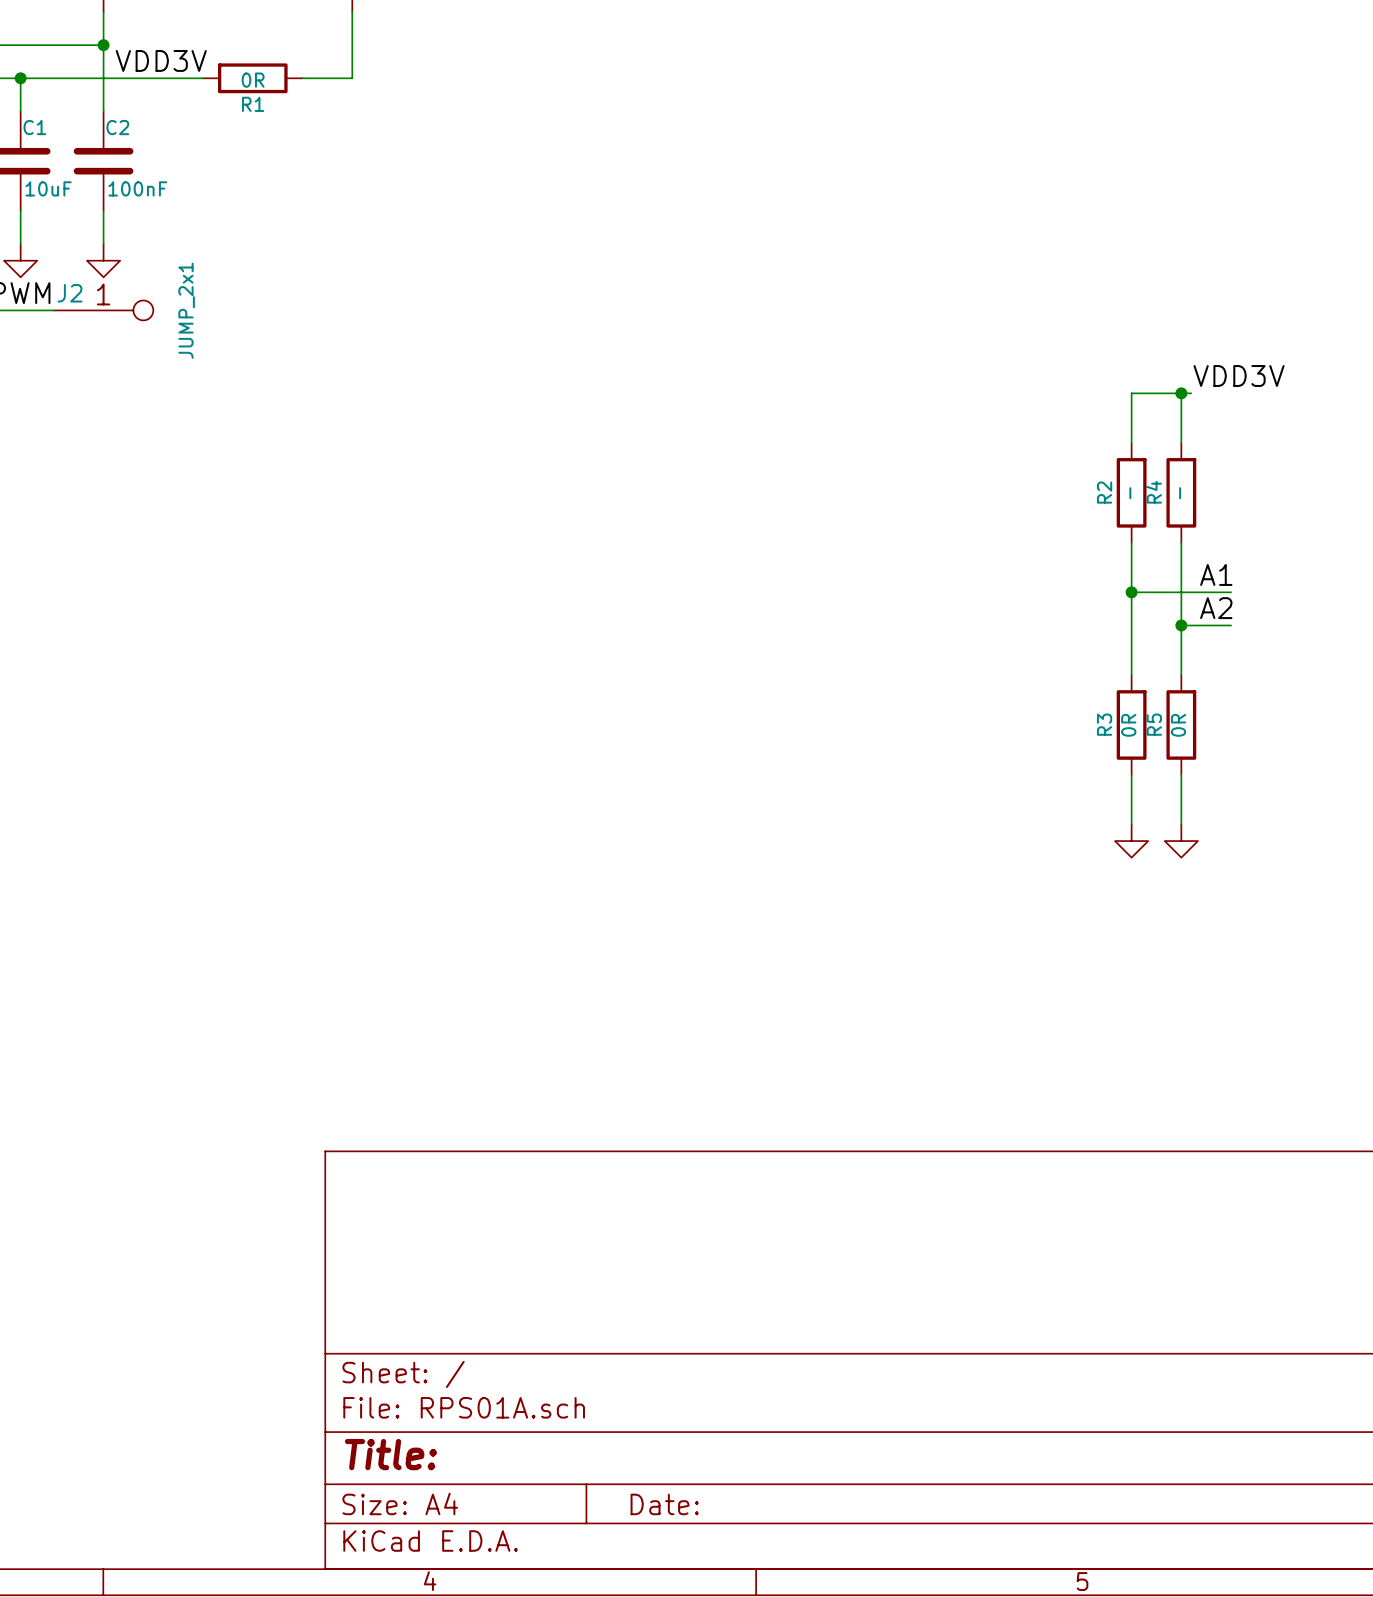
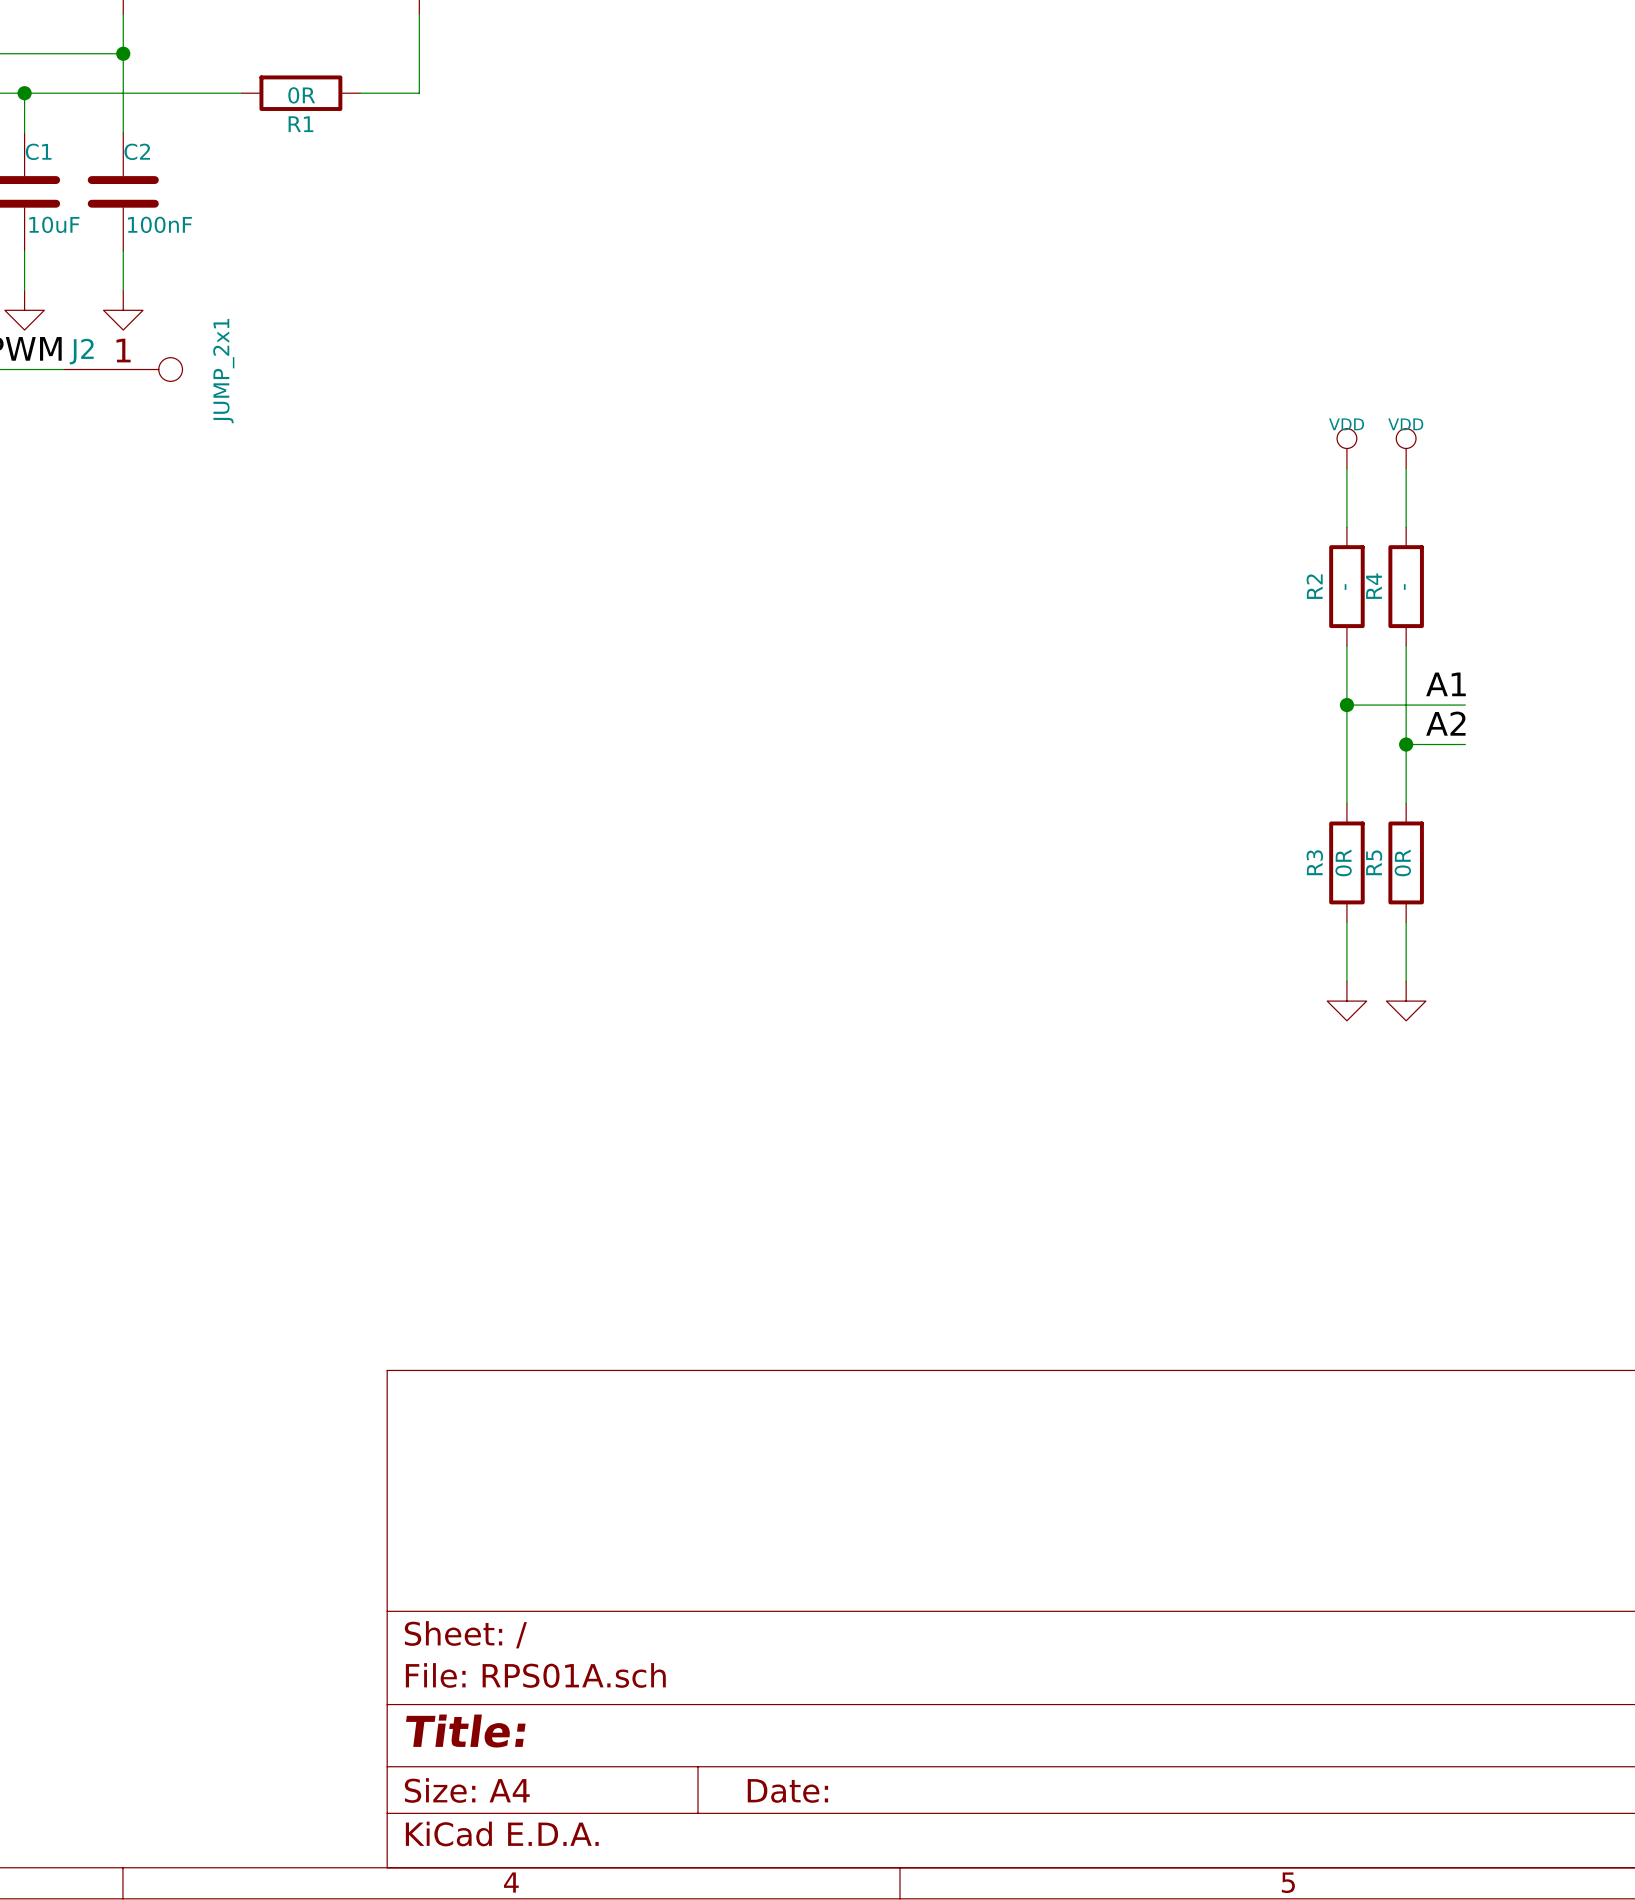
label: VDD3V (161, 60) -> none
label: VDD3V (1239, 375) -> none
power symbol: none -> VDD (1346, 448)
power symbol: none -> VDD (1406, 448)
wire: (1131, 393) (1191, 393) -> none
junction: (1181, 393) -> none

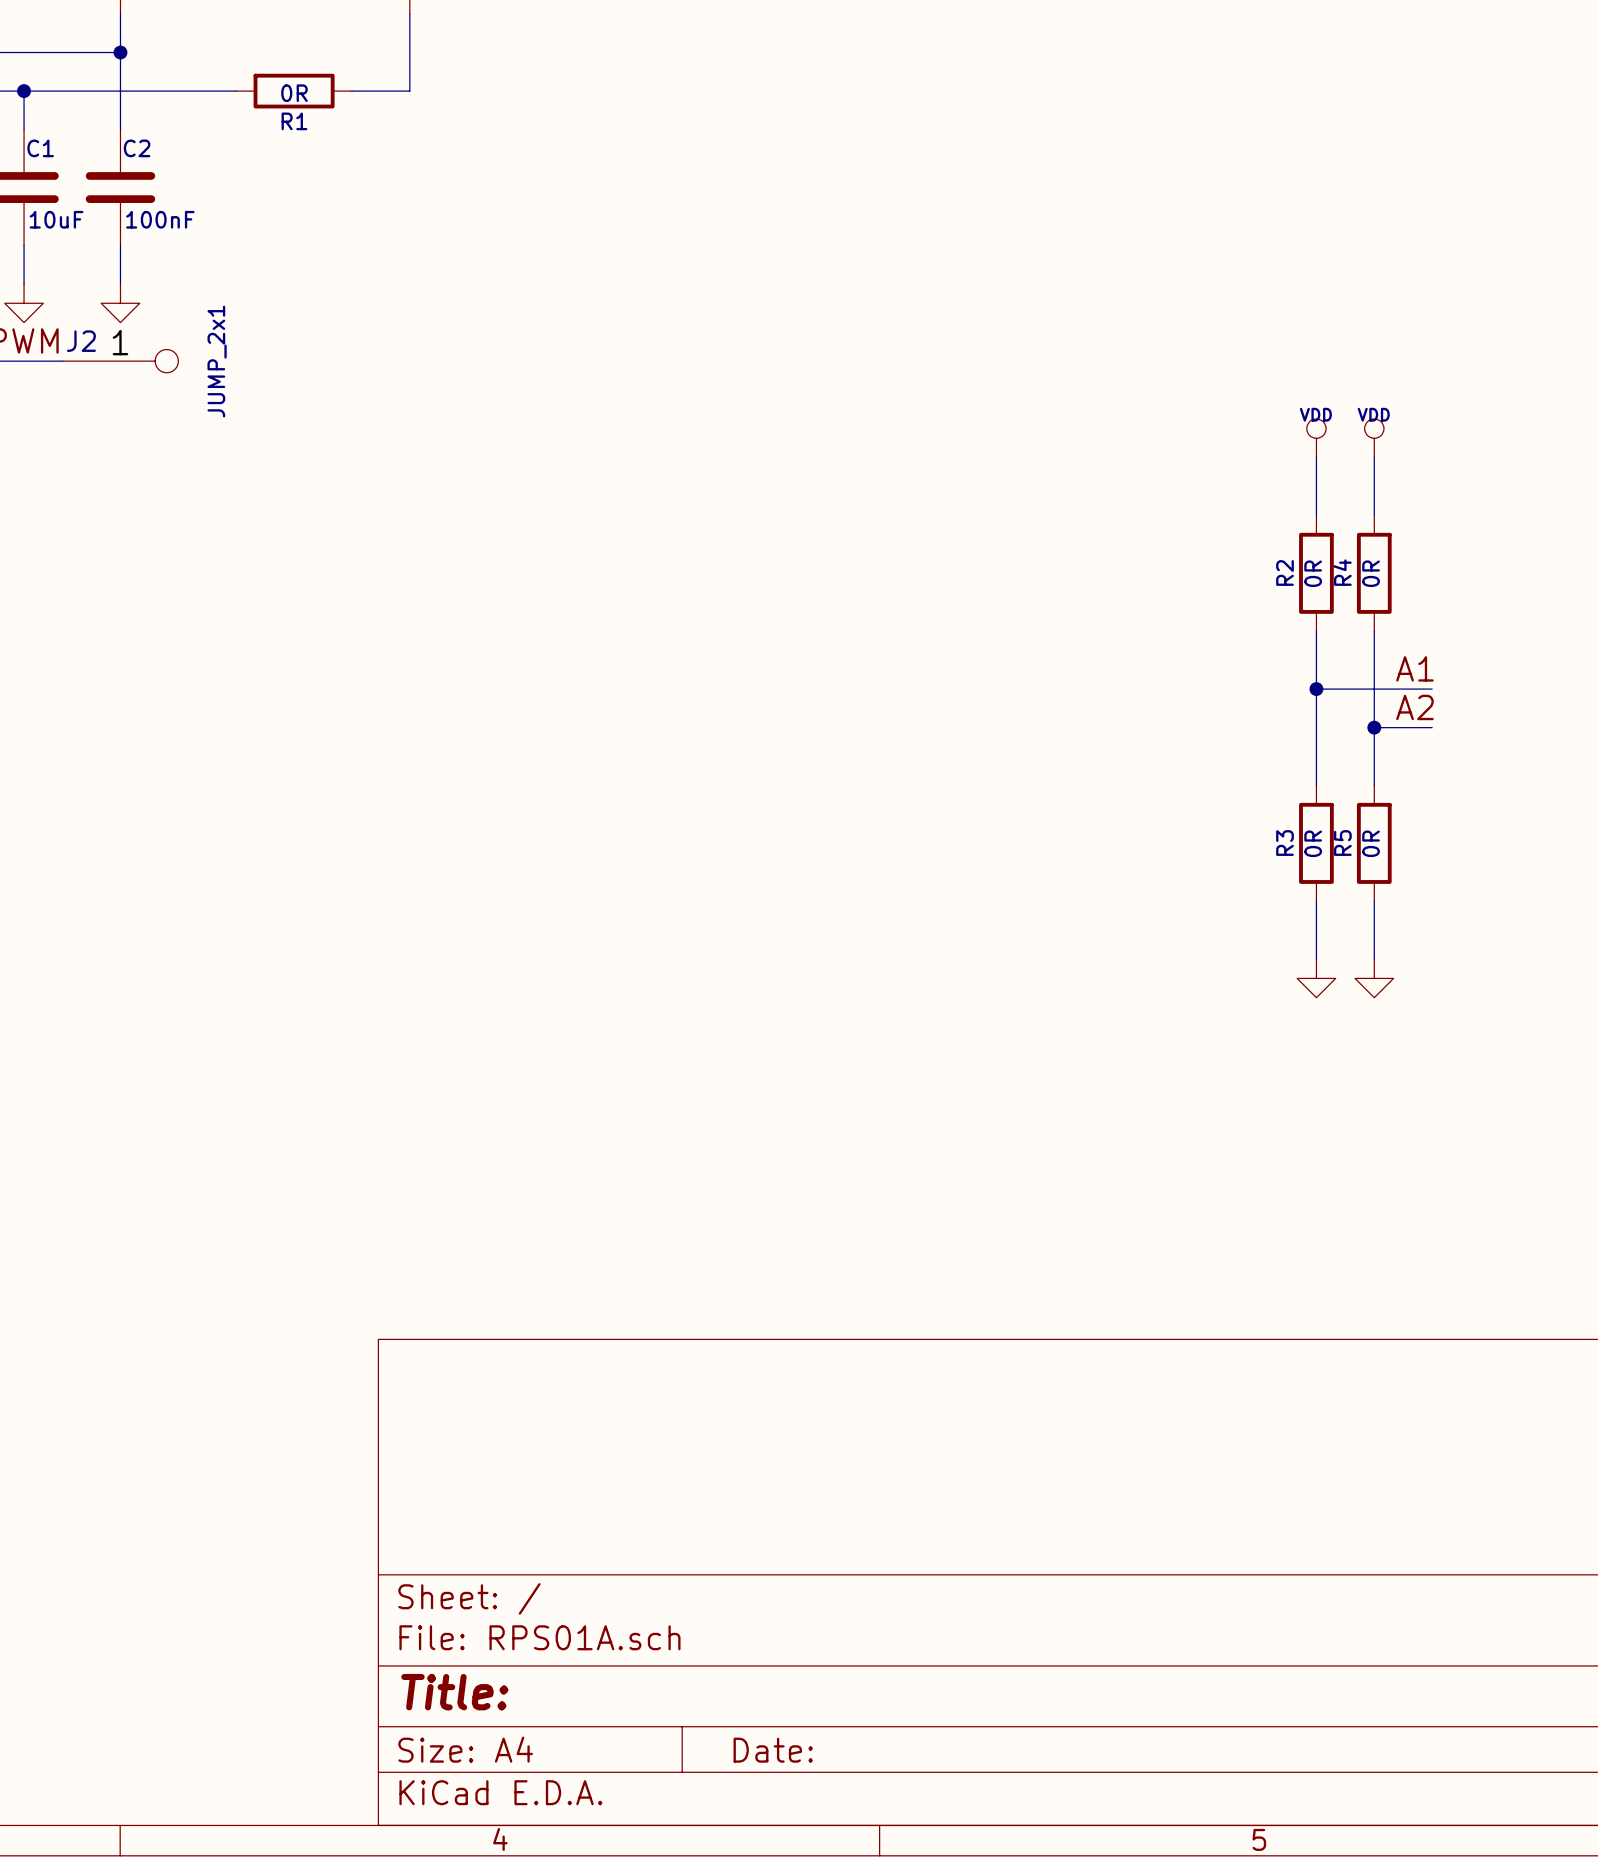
R2 value: - (1345, 587) -> 0R (1313, 573)
R4 value: - (1404, 587) -> 0R (1371, 573)

